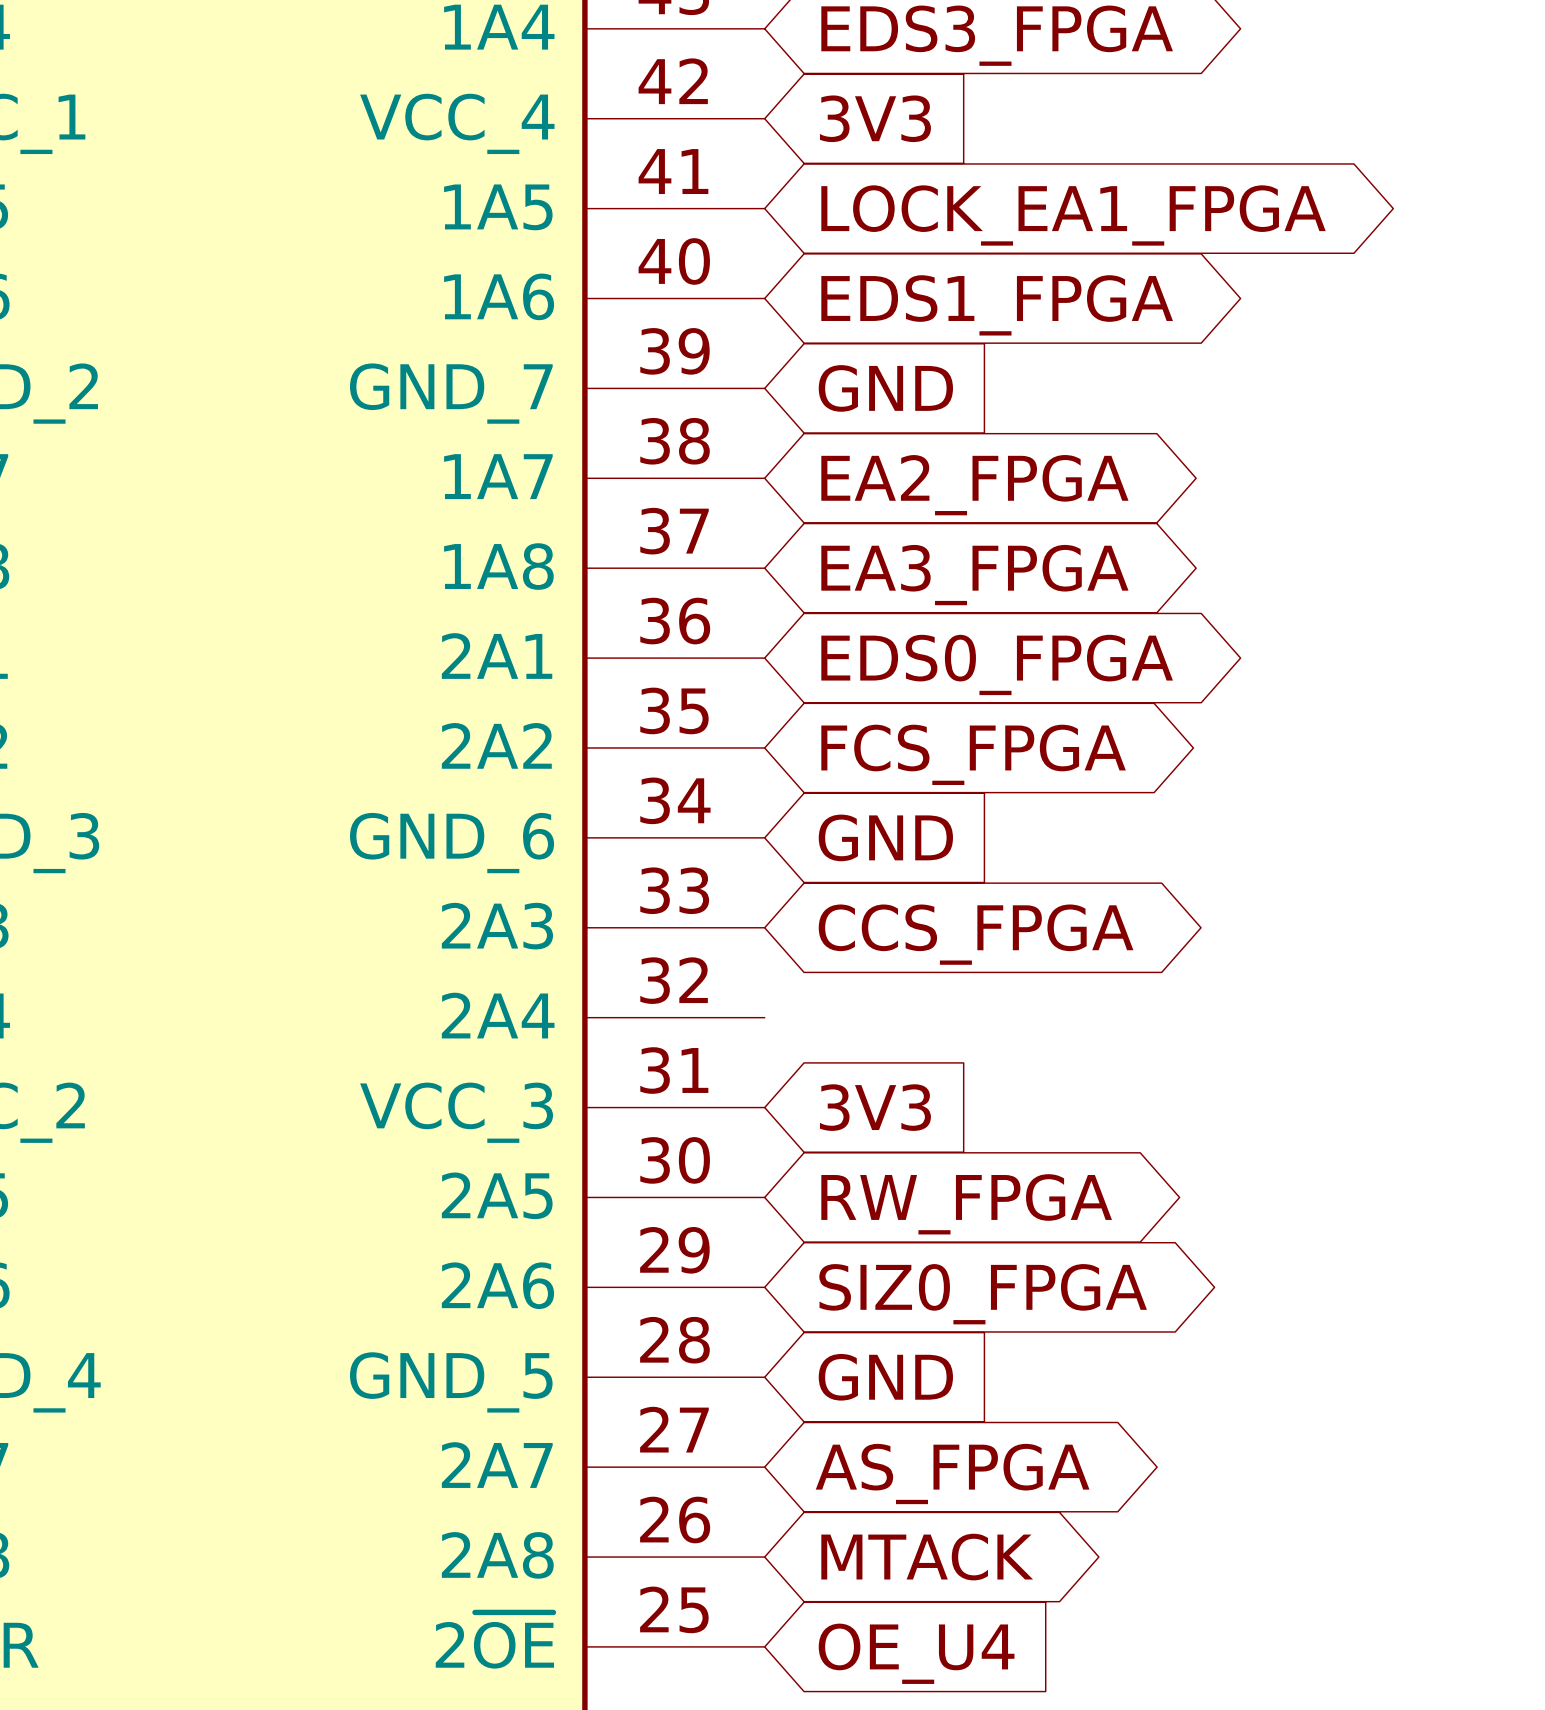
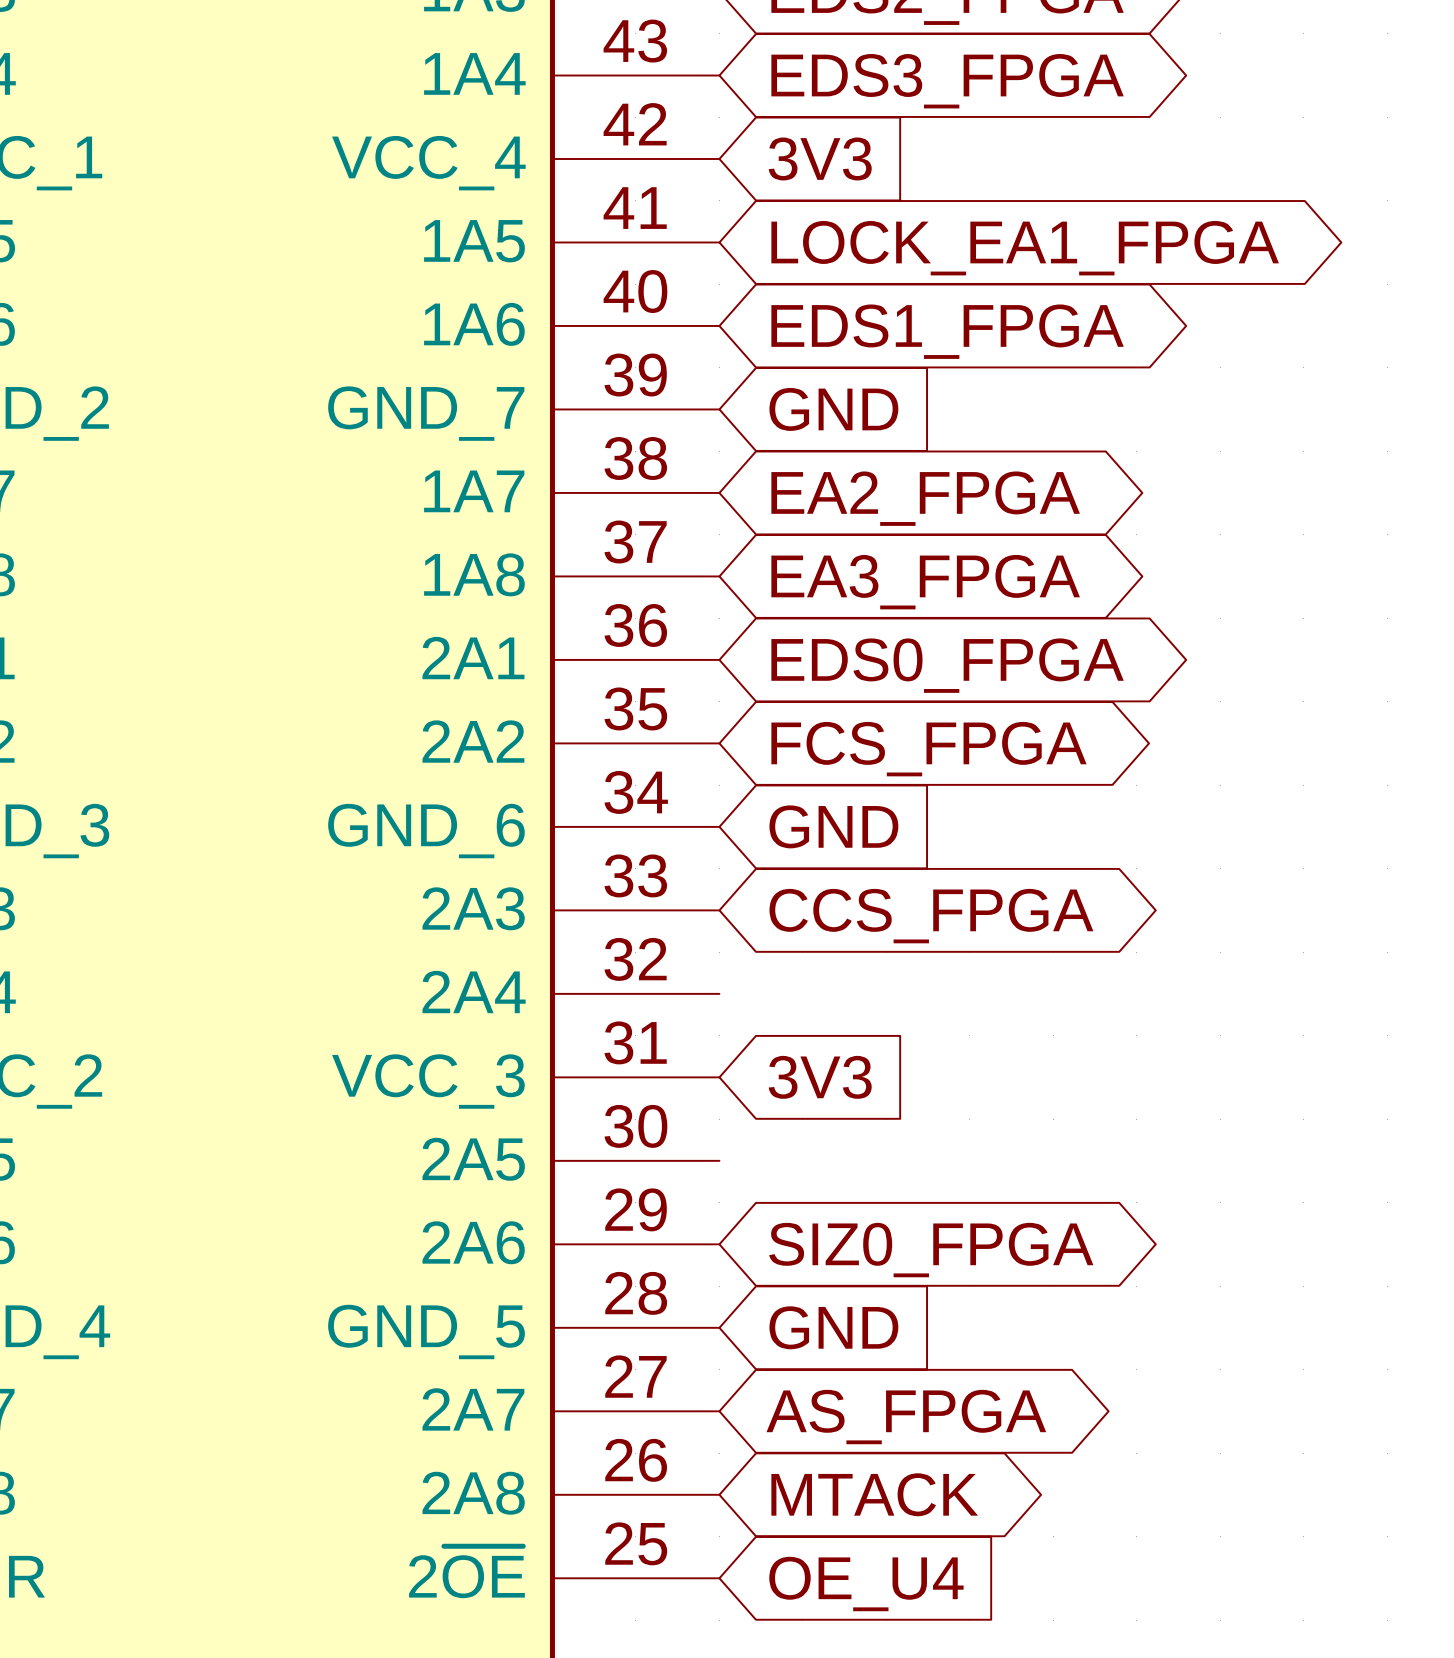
global label: RW_FPGA (966, 1204) -> none

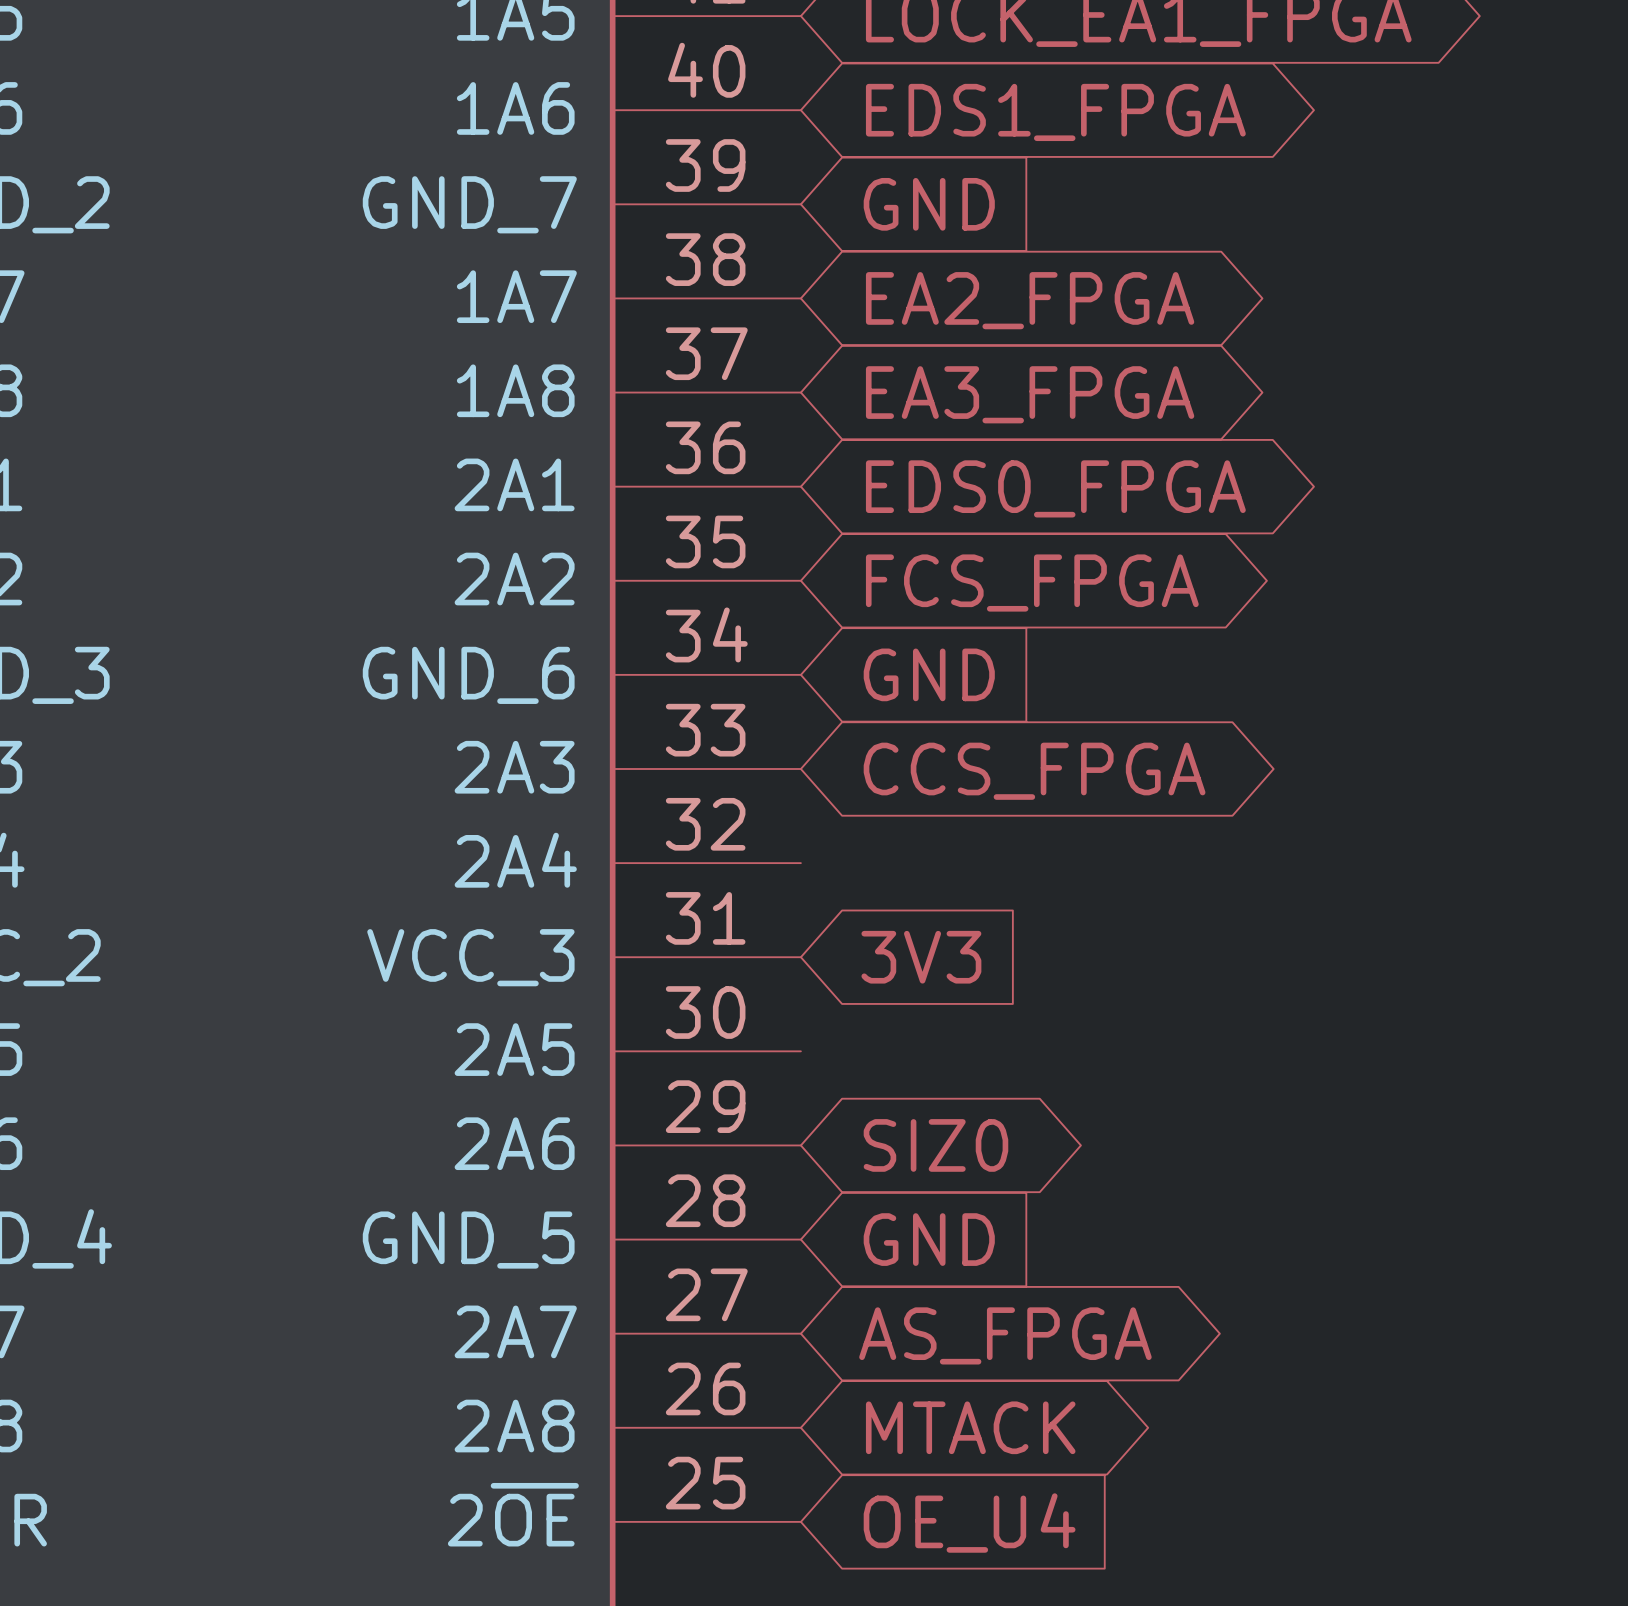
global label: SIZ0_FPGA (931, 1250) -> SIZ0 (935, 1145)

